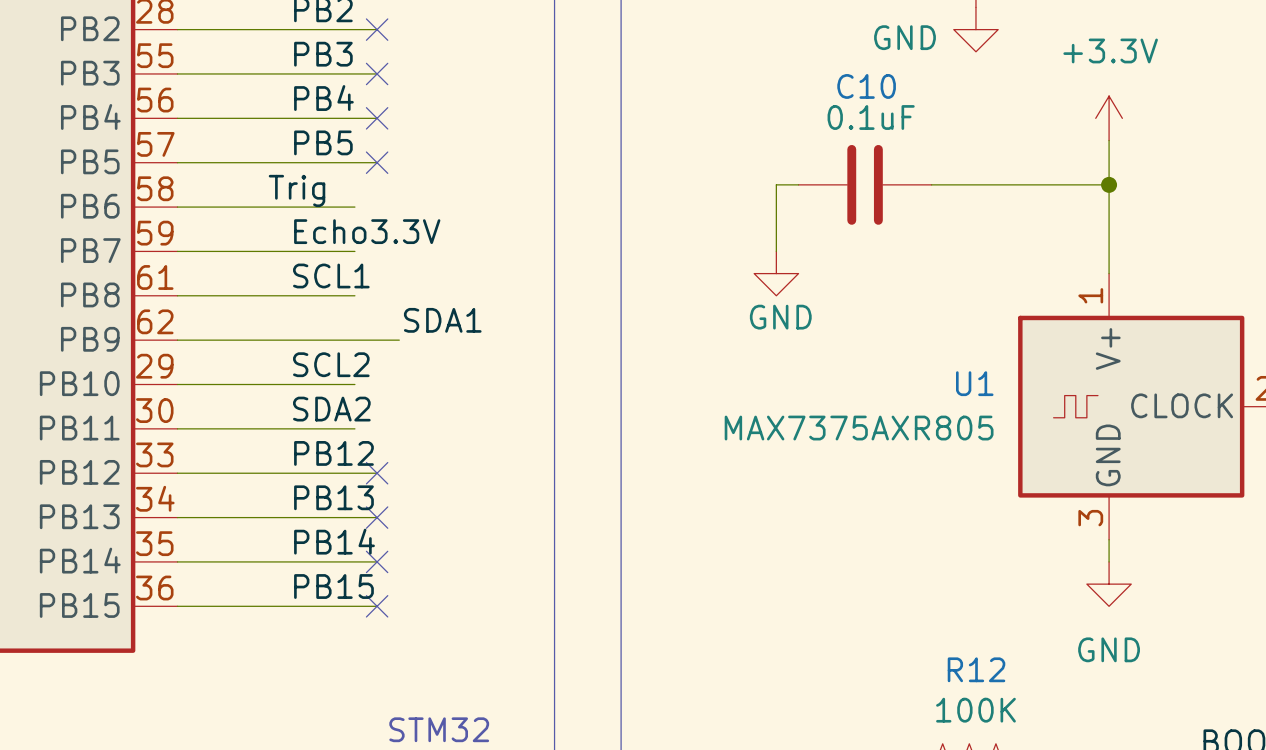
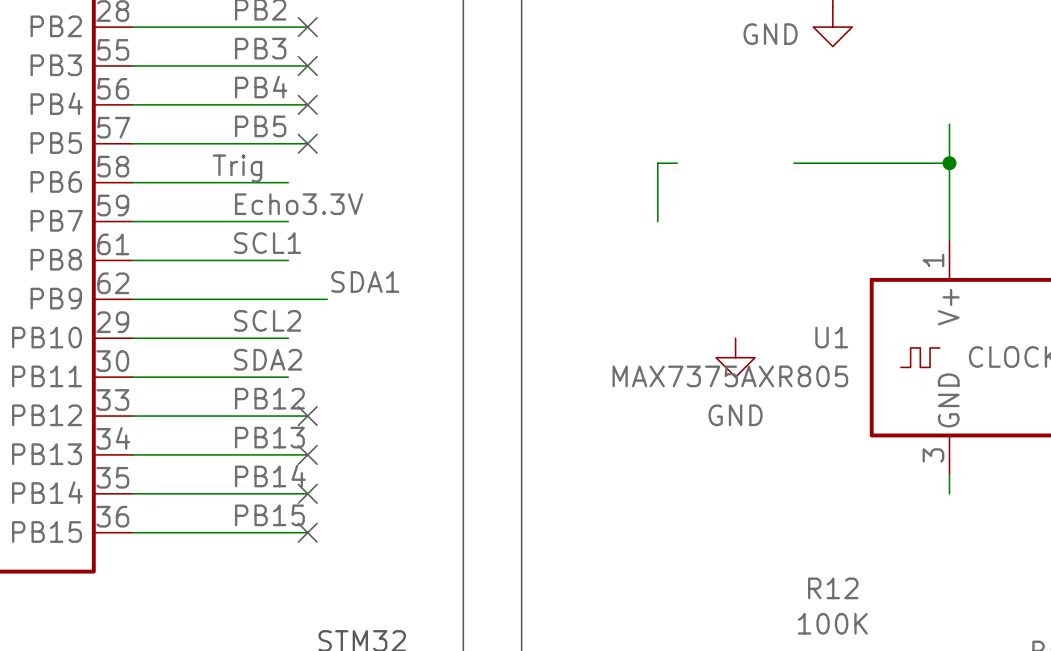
power symbol: +3.3V (1109, 118) -> none
C10: 0.1uF (865, 184) -> none
power symbol: GND (776, 273) -> none
power symbol: none -> GND (735, 357)
power symbol: GND (1109, 584) -> none

